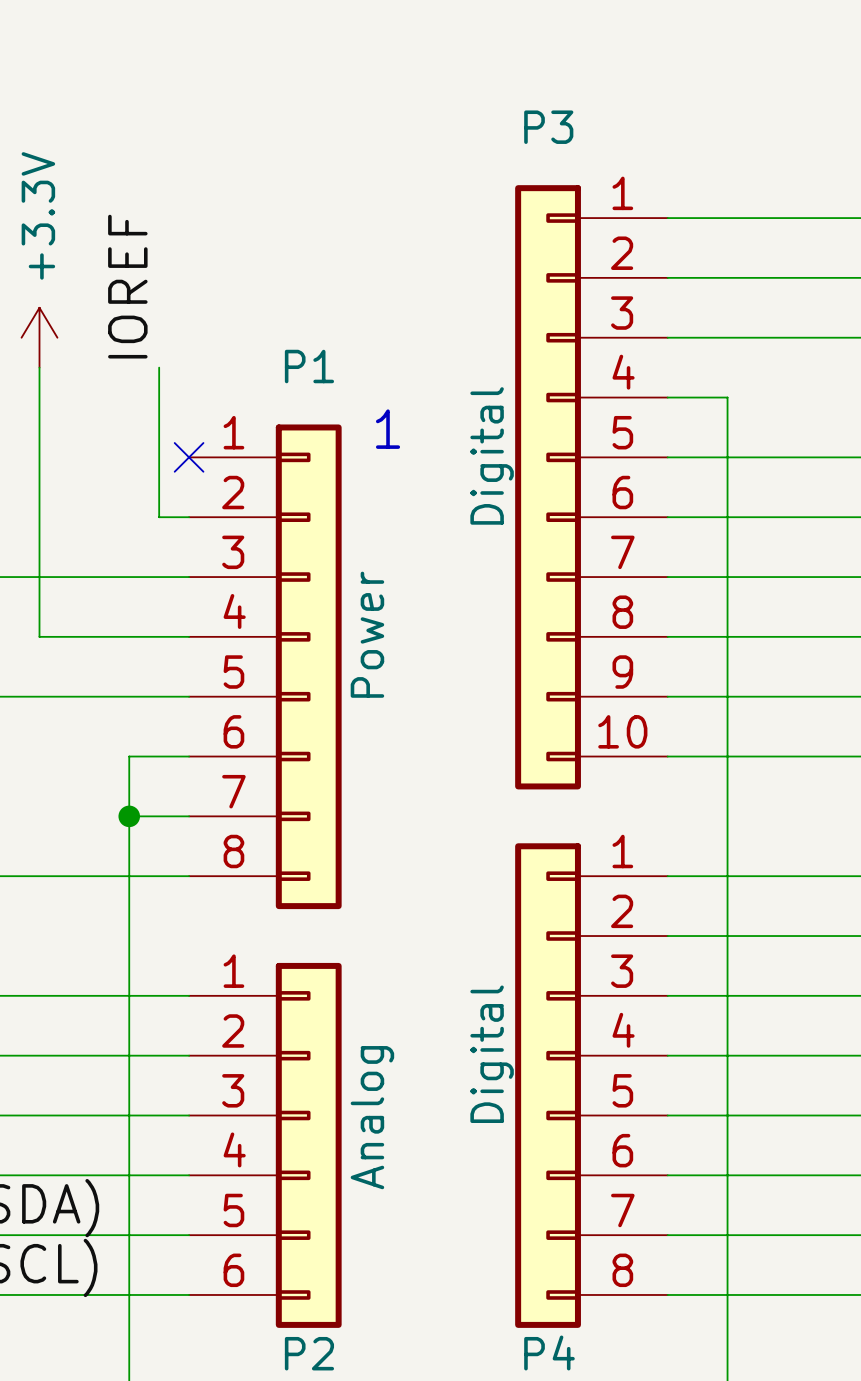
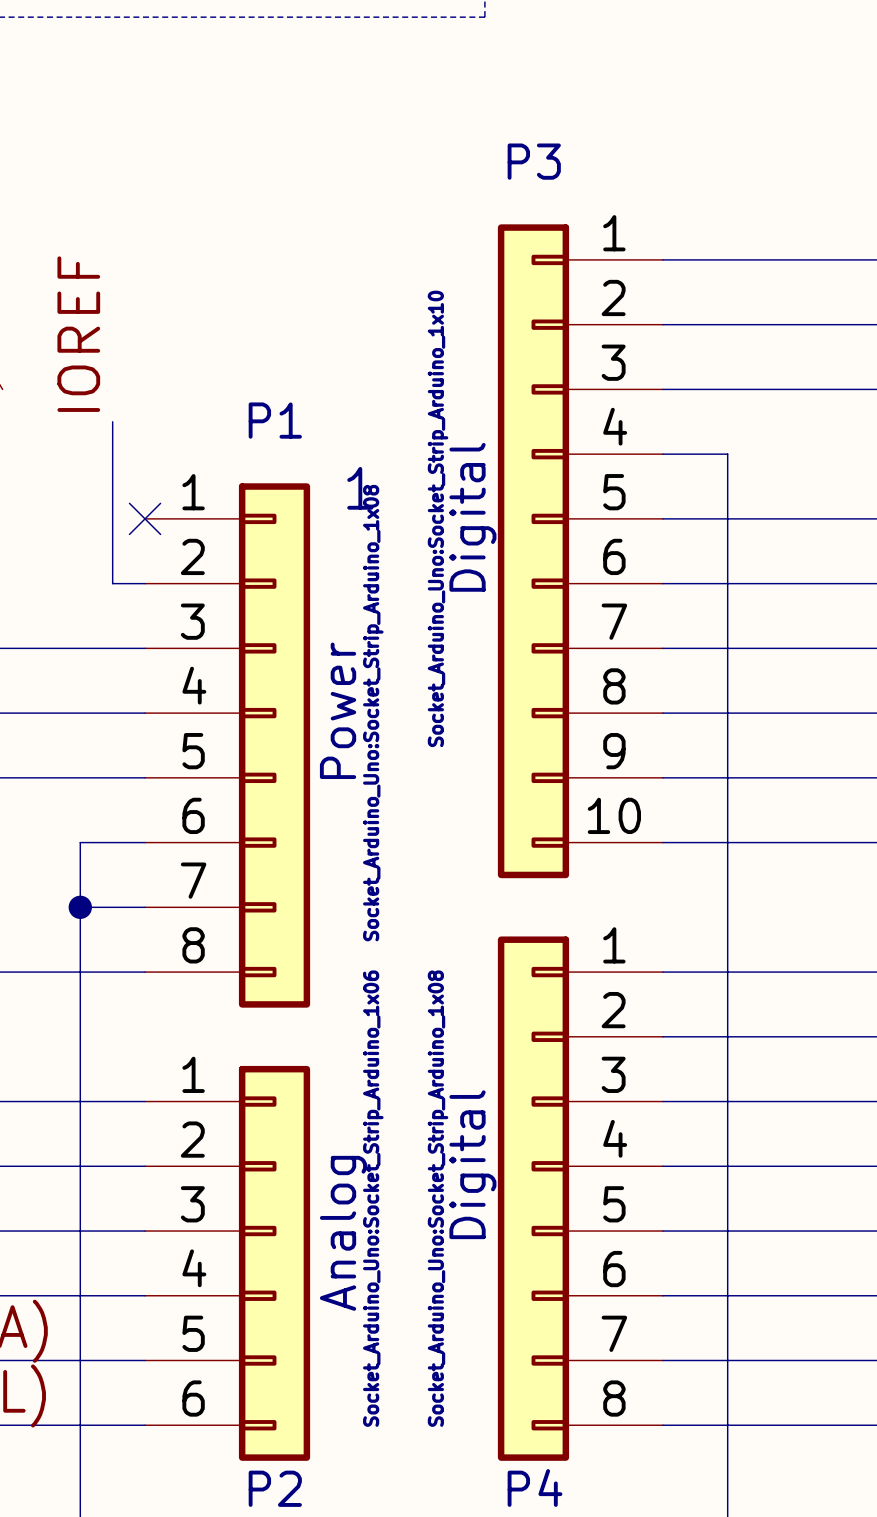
P3 text: none -> Socket_Arduino_Uno:Socket_Strip_Arduino_1x10 (438, 518)
P1 text: none -> Socket_Arduino_Uno:Socket_Strip_Arduino_1x08 (373, 713)
P2 text: none -> Socket_Arduino_Uno:Socket_Strip_Arduino_1x06 (373, 1198)
P4 text: none -> Socket_Arduino_Uno:Socket_Strip_Arduino_1x08 (438, 1198)

